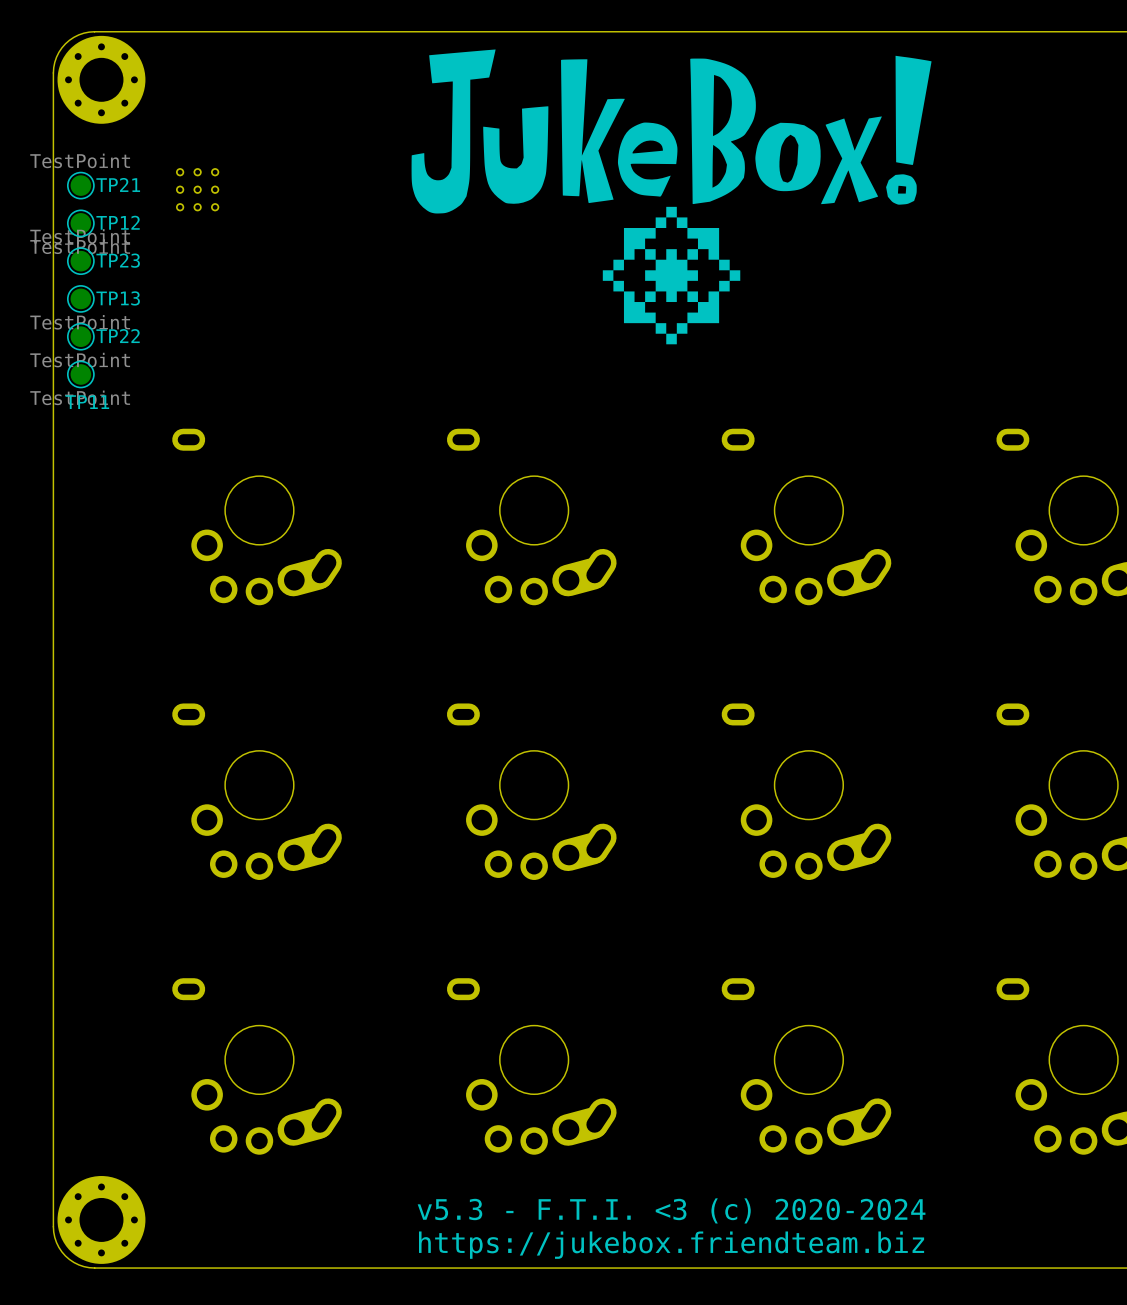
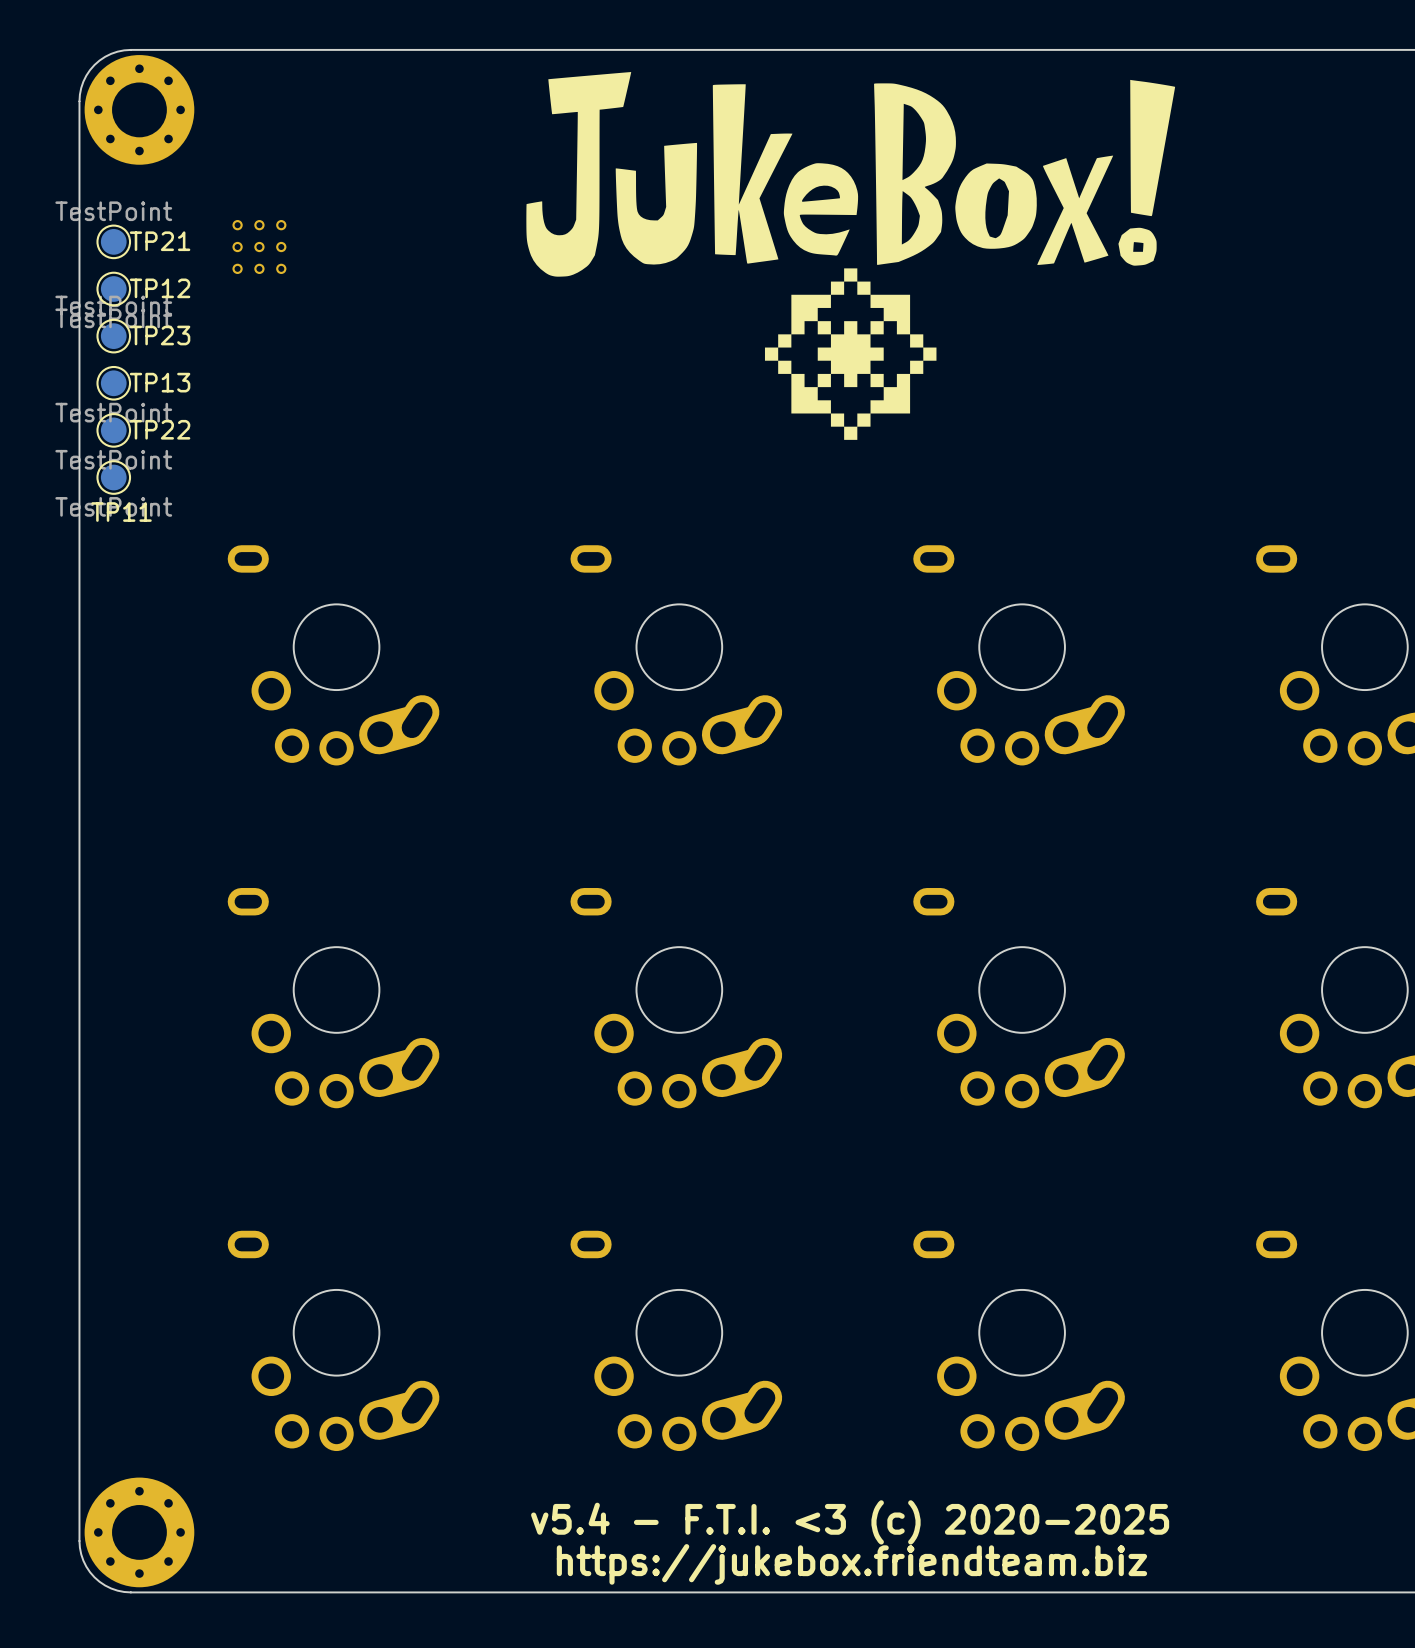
text: v5.3 - F.T.I. <3 (c) 2020-2024 (671, 1210) -> v5.4 - F.T.I. <3 (c) 2020-2025 (850, 1522)

